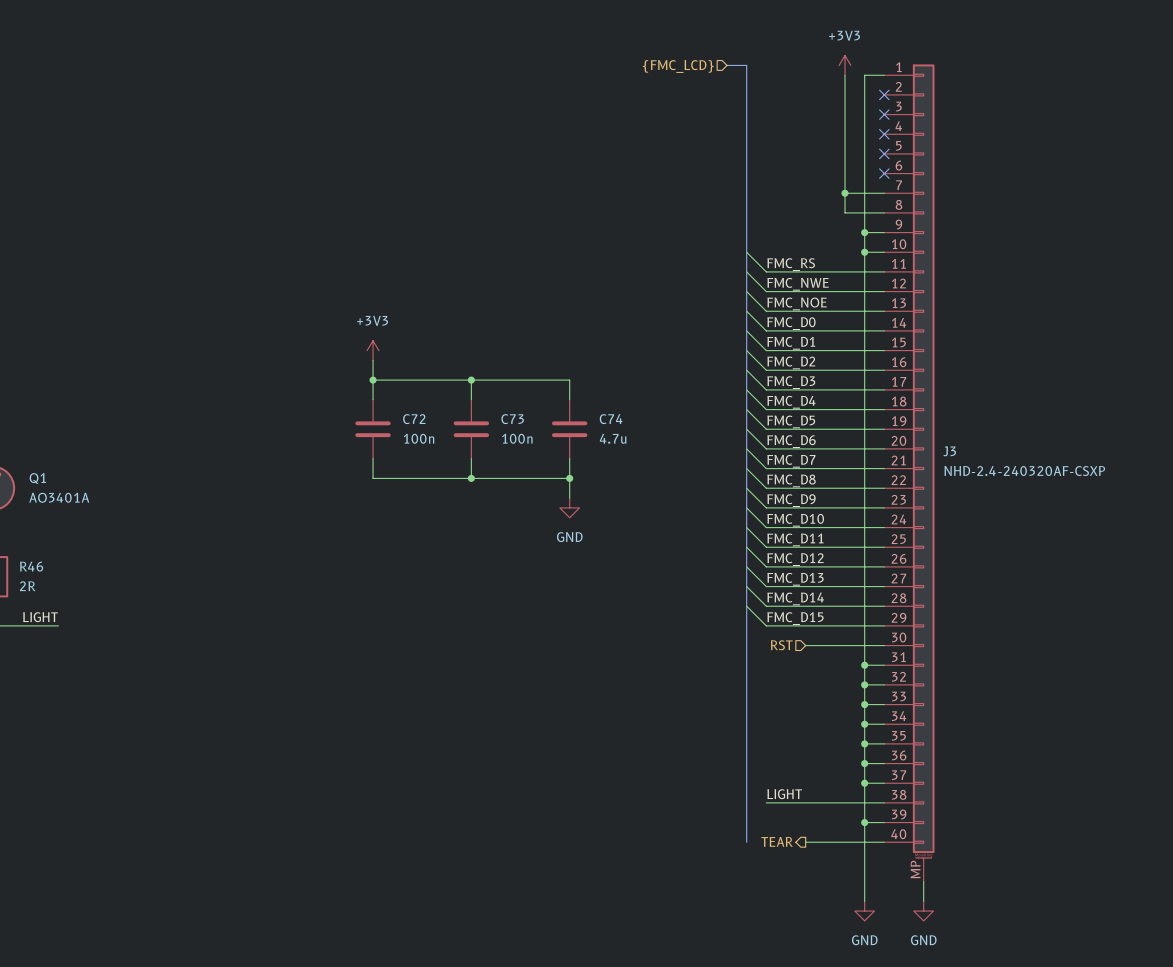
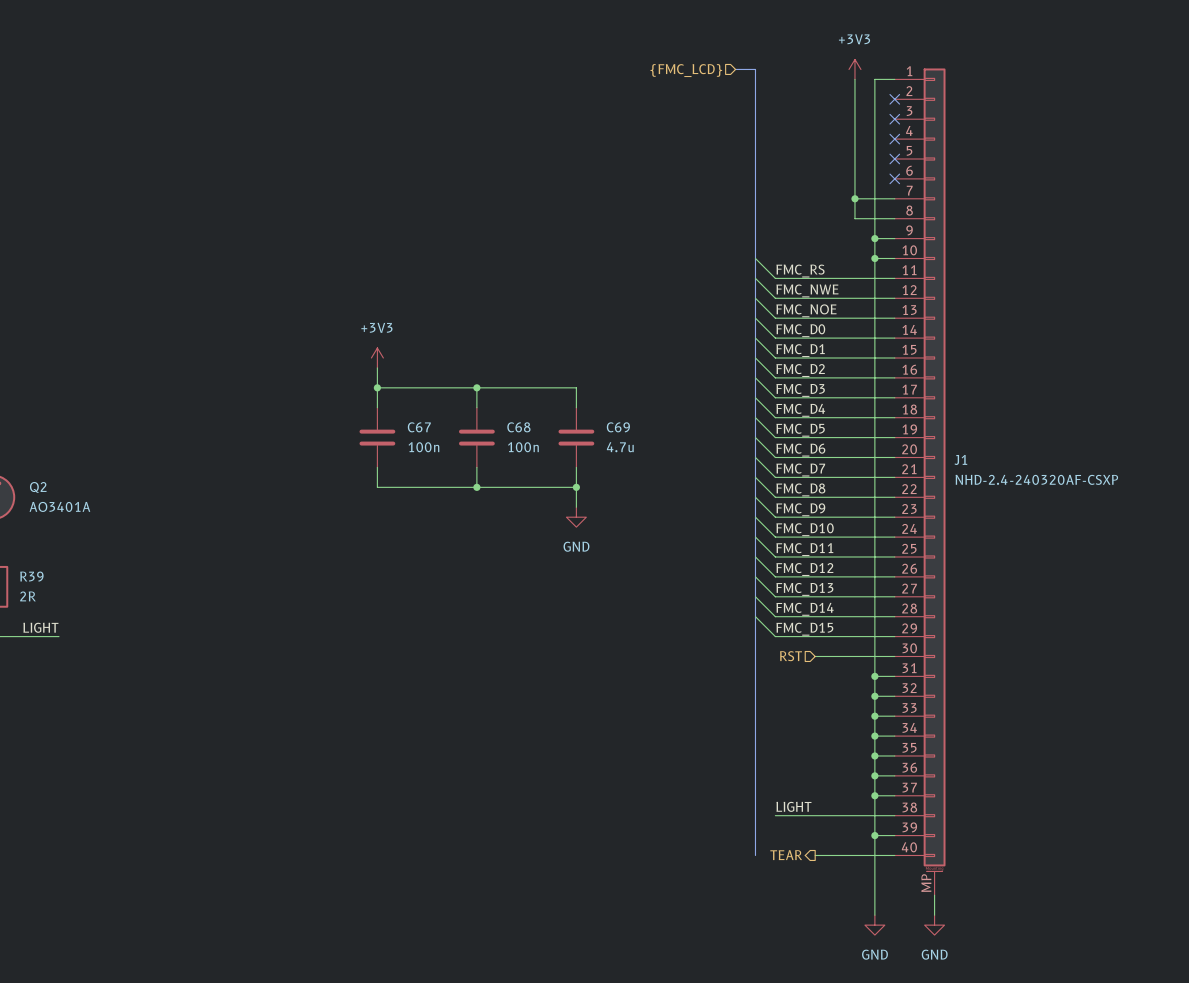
C72 name: C72 (414, 419) -> C67 (419, 427)
C73 name: C73 (512, 419) -> C68 (518, 427)
C74 name: C74 (611, 419) -> C69 (618, 427)
J3 name: J3 (949, 451) -> J1 (960, 459)
Q1 name: Q1 (37, 478) -> Q2 (38, 487)
R46 name: R46 (31, 566) -> R39 (31, 576)

